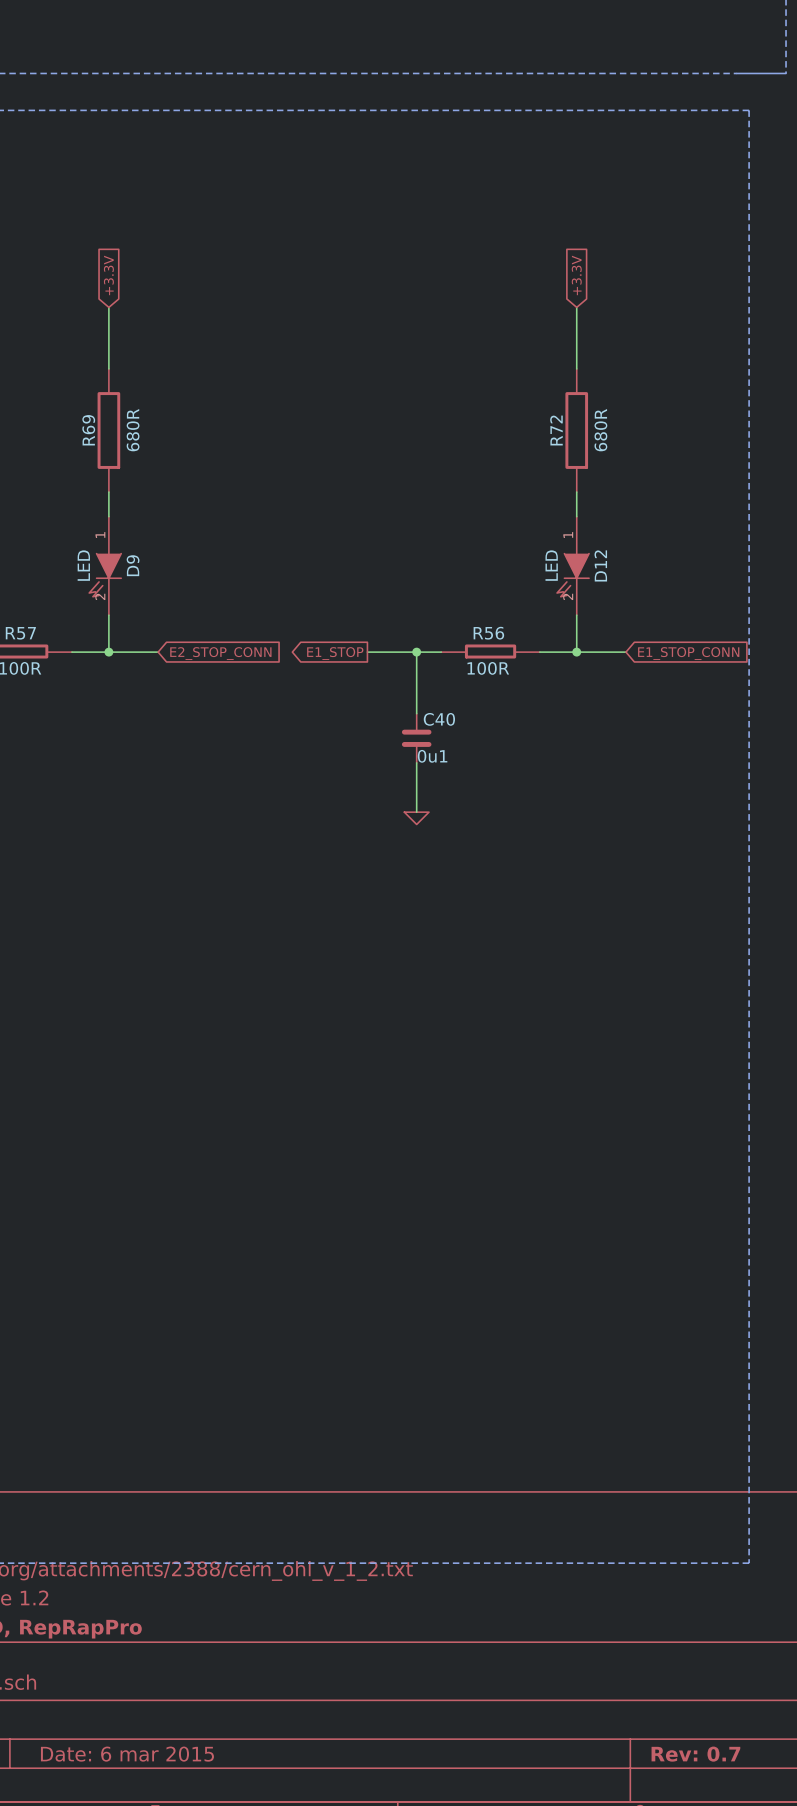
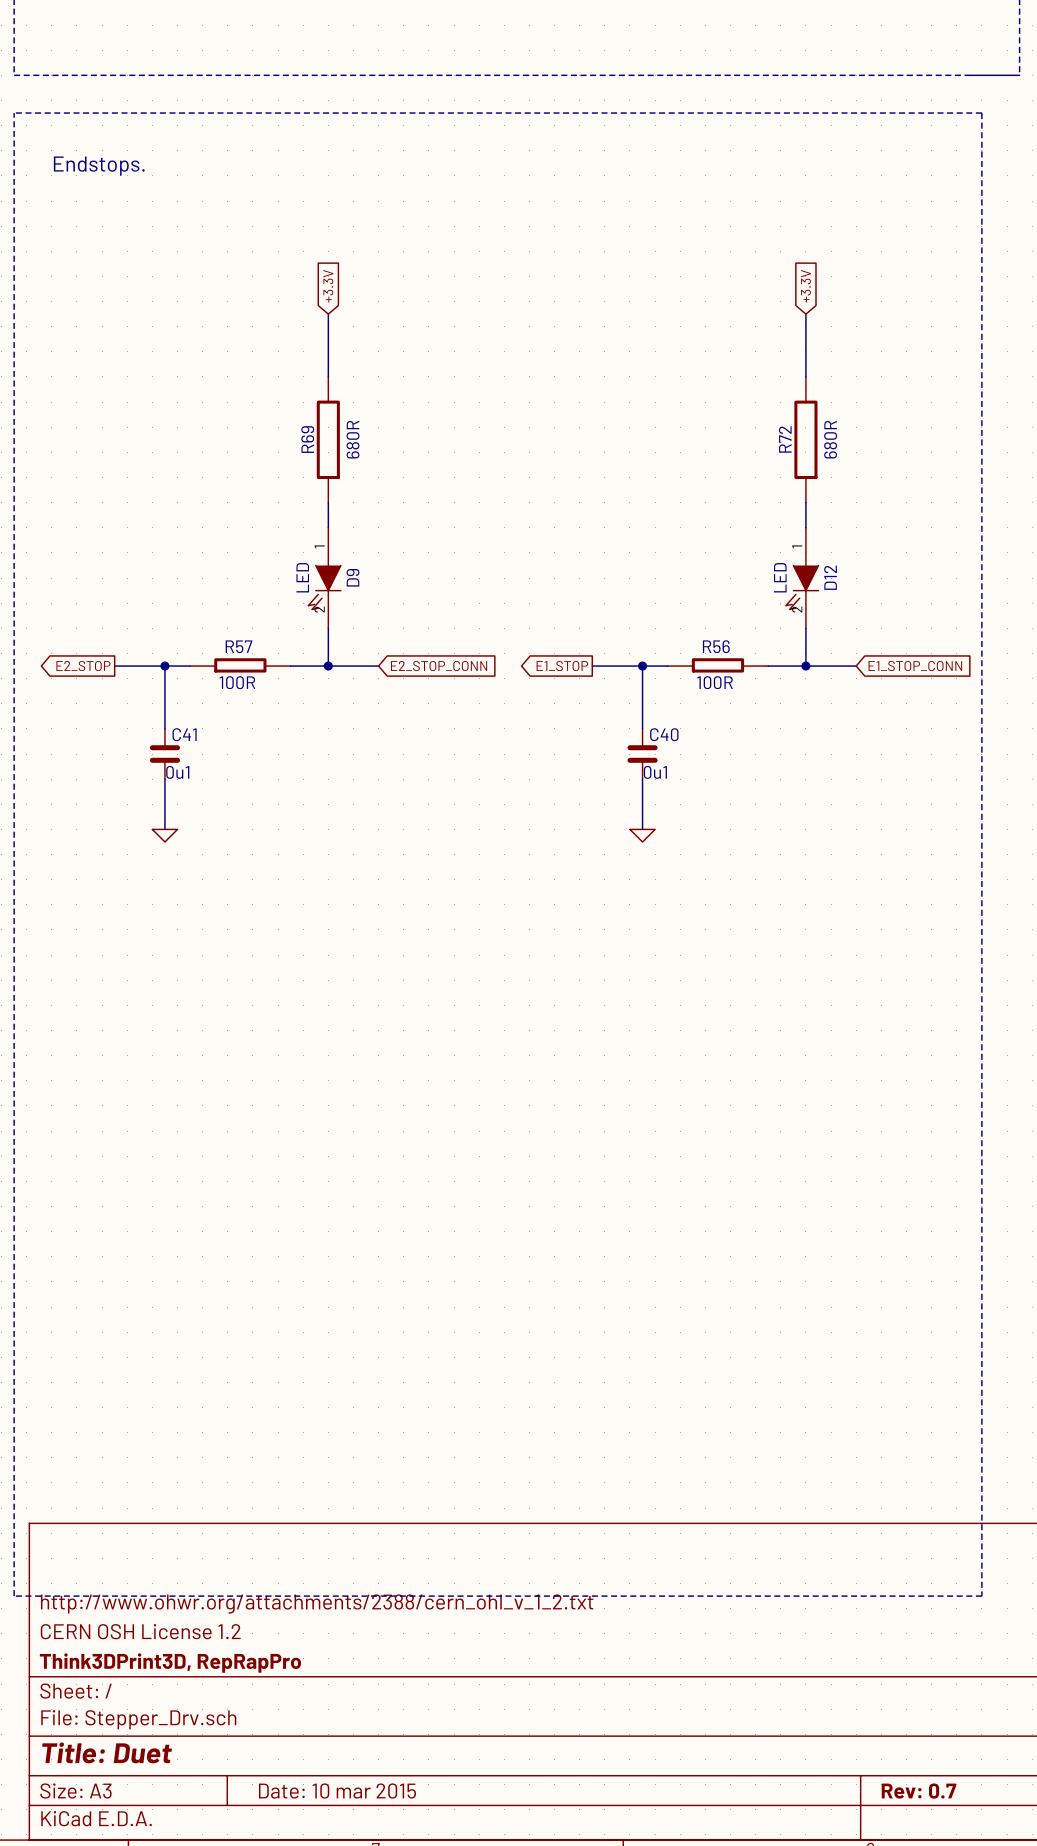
title block: Date: 6 mar 2015 (127, 1754) -> Date: 10 mar 2015 (337, 1791)

